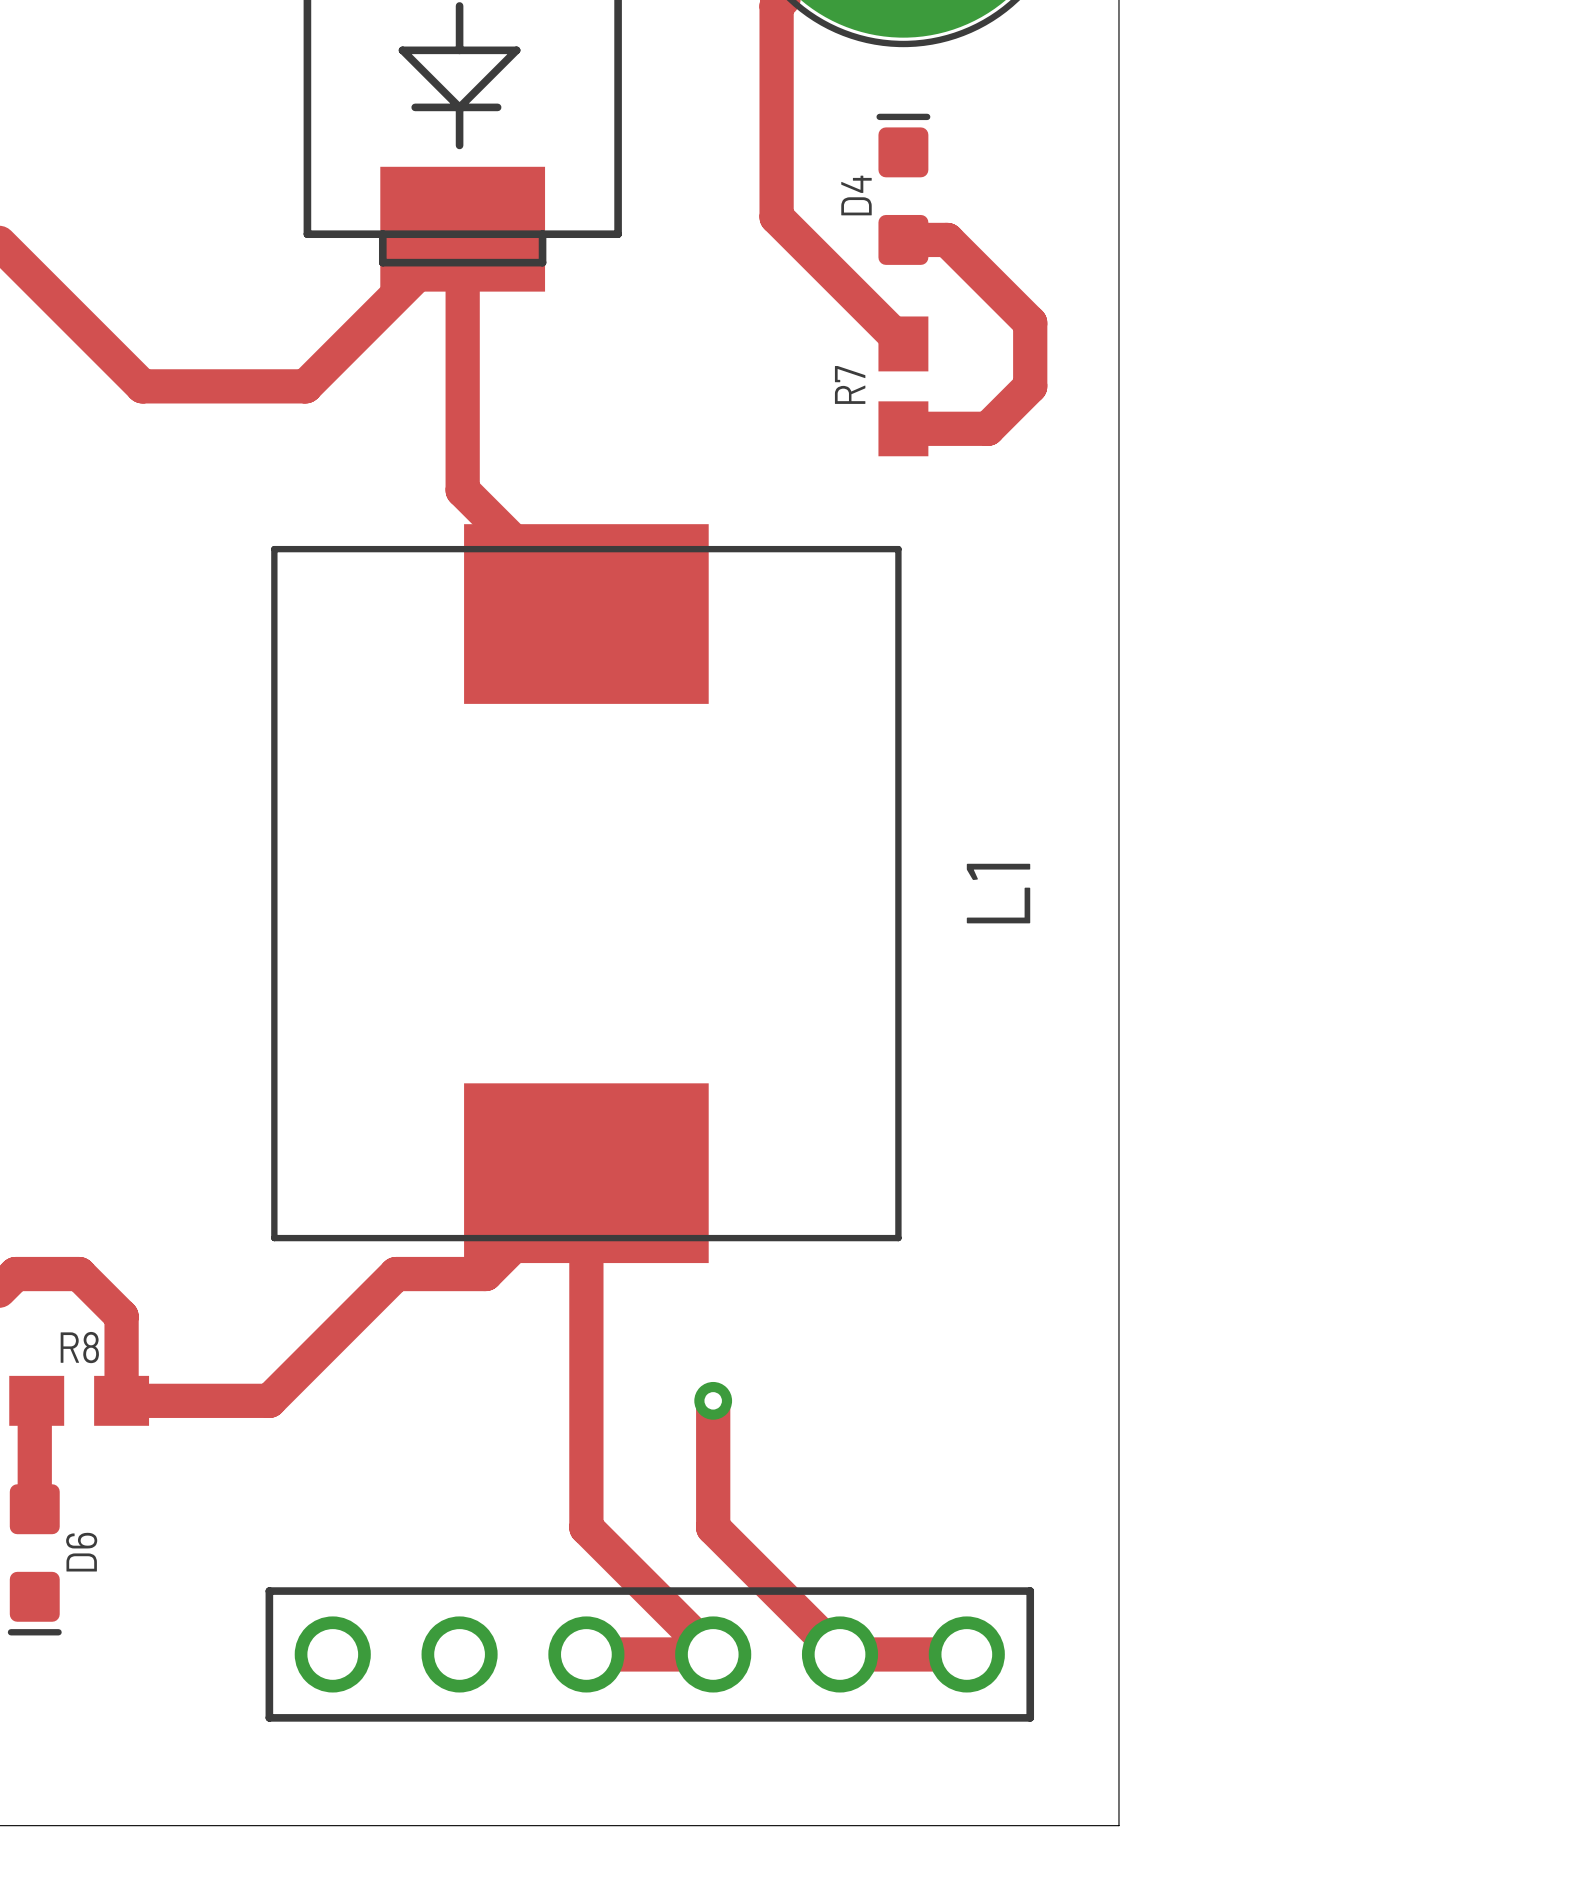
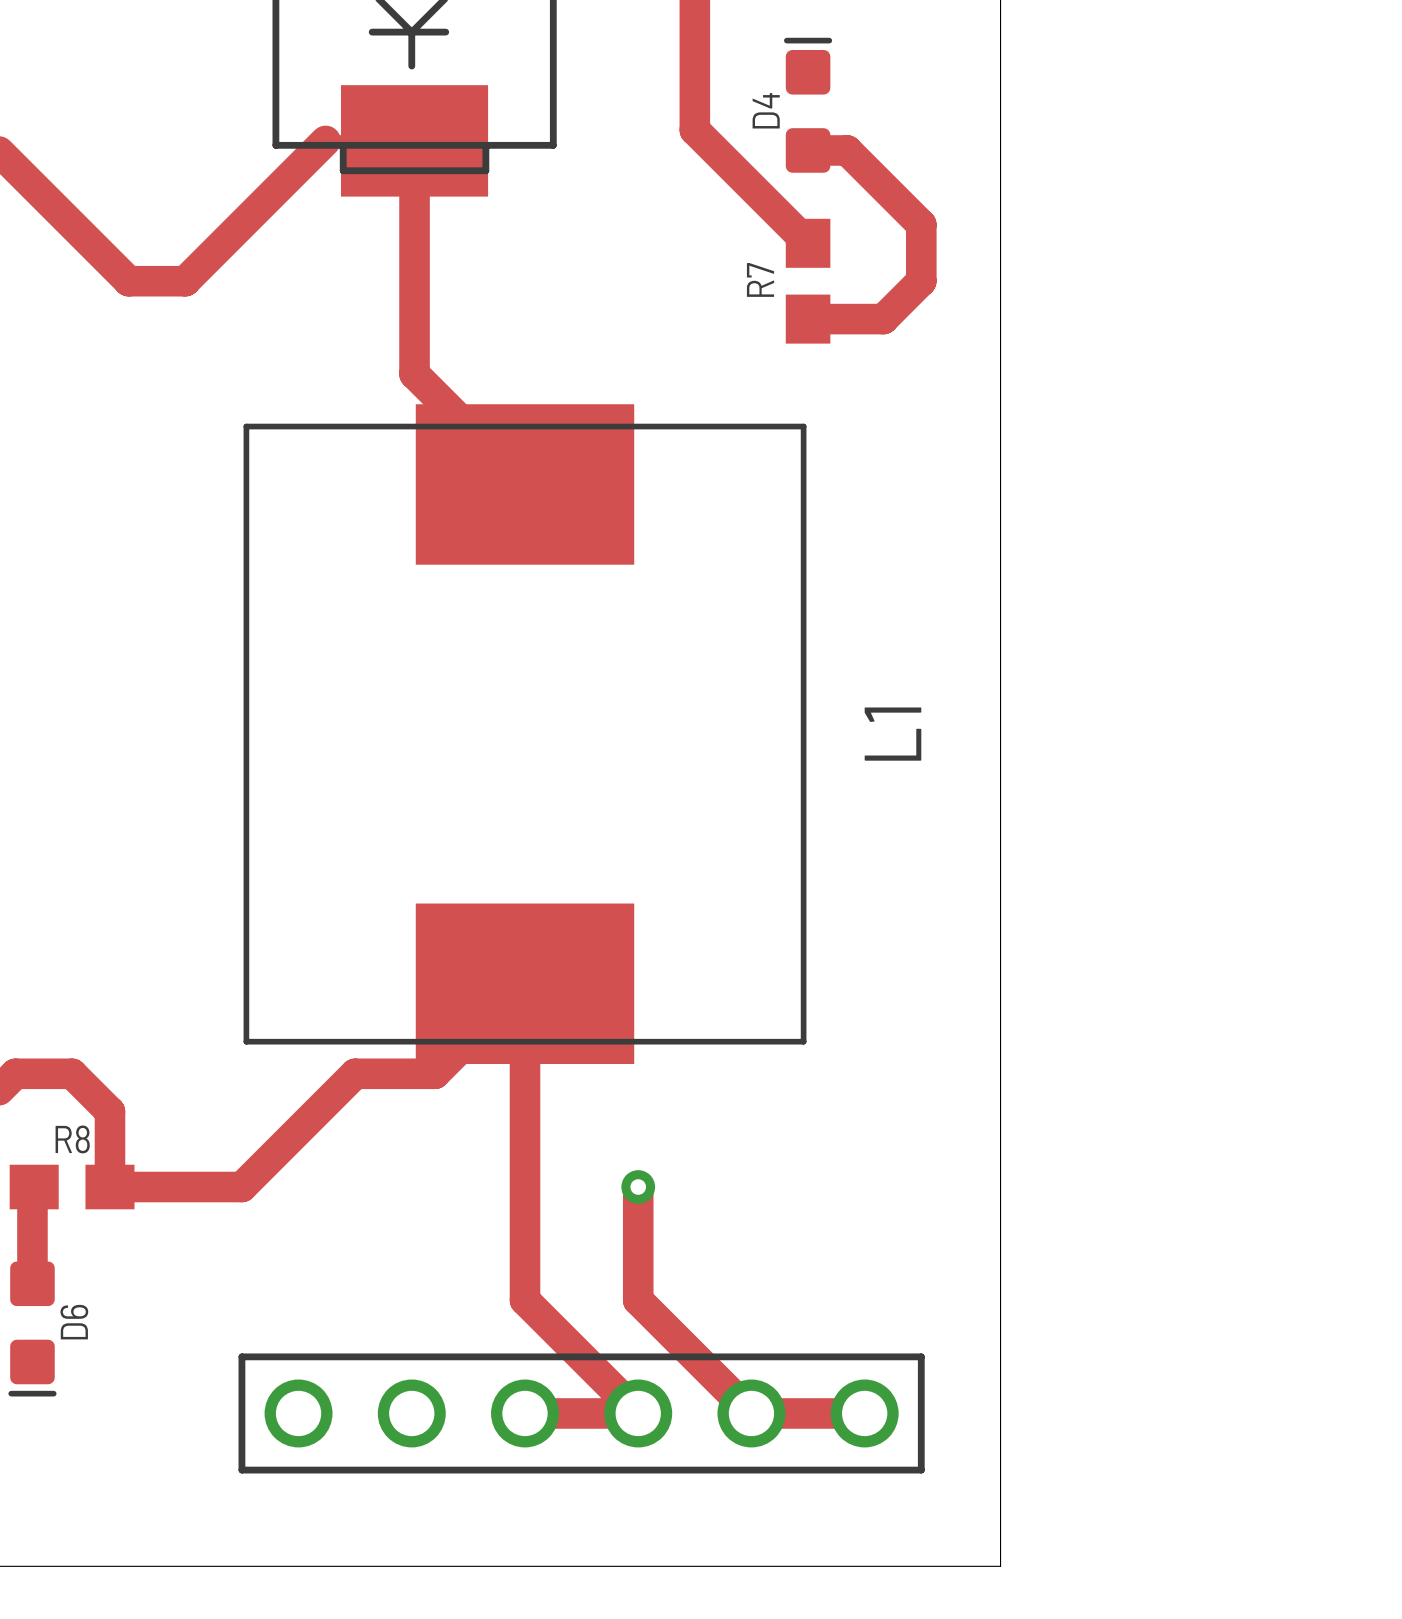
track: (462, 229) (305, 386) (205, 386) -> (414, 140) (325, 140) (185, 281)

